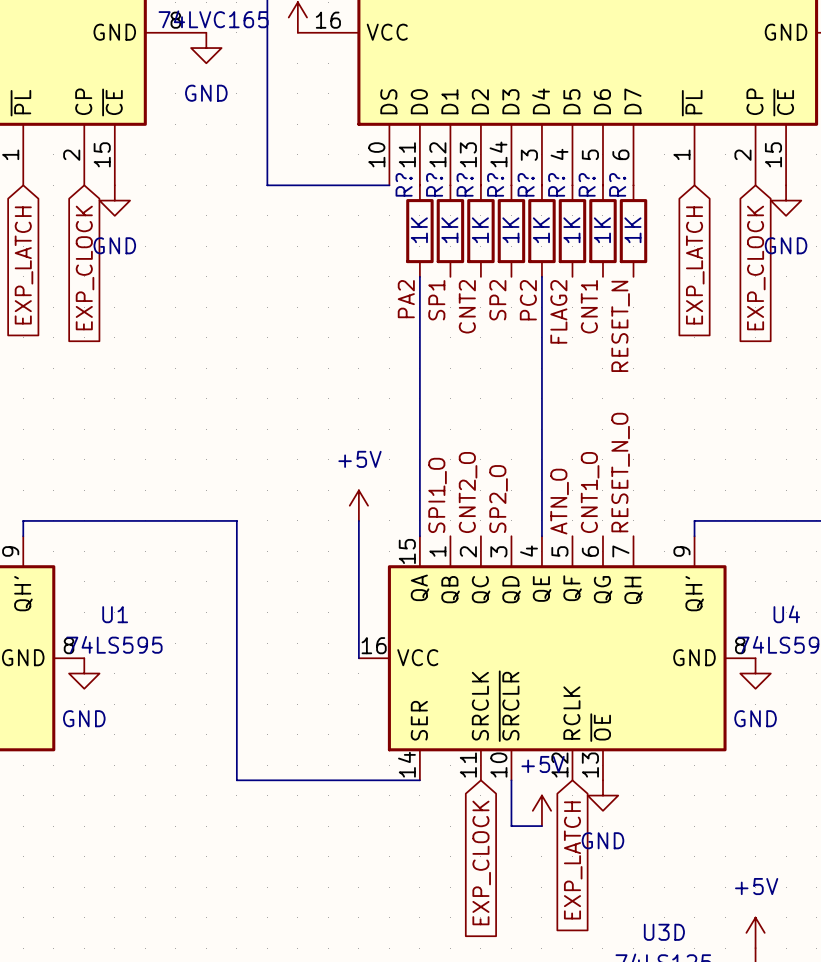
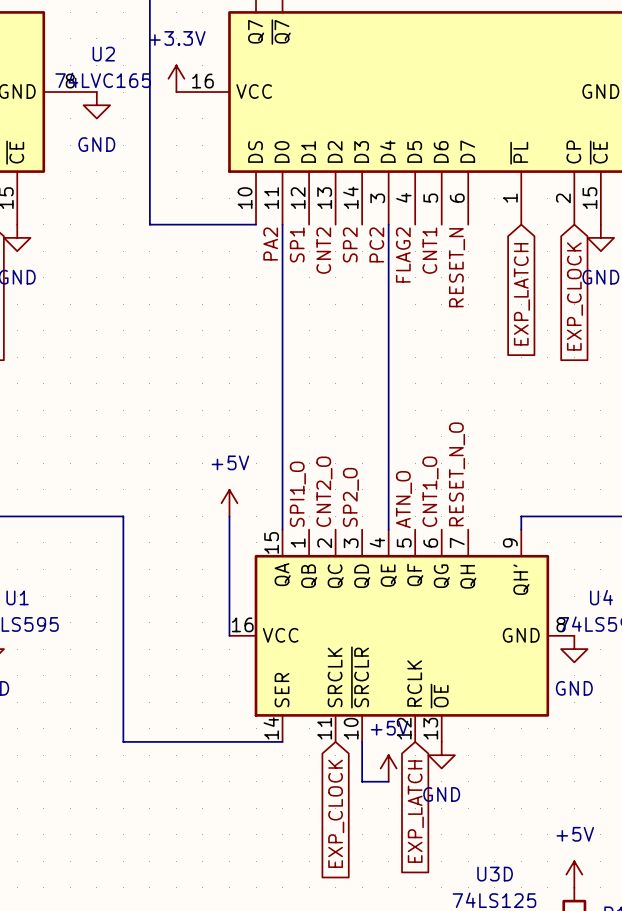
wire: none -> (282, 224) (282, 304)
wire: none -> (388, 224) (388, 304)
R?: 1K (419, 231) -> none
R?: 1K (450, 231) -> none
R?: 1K (480, 231) -> none
R?: 1K (511, 231) -> none
R?: 1K (541, 231) -> none
R?: 1K (572, 231) -> none
R?: 1K (602, 231) -> none
R?: 1K (633, 231) -> none
label position: PA2 (406, 299) -> PA2 (270, 244)
label position: SP1 (436, 300) -> SP1 (297, 244)
label position: SP2 (497, 300) -> SP2 (350, 244)
label position: PC2 (528, 300) -> PC2 (376, 244)
label position: CNT2 (467, 306) -> CNT2 (323, 250)
label position: CNT1 (589, 306) -> CNT1 (429, 250)
label position: FLAG2 (558, 311) -> FLAG2 (403, 255)
label position: RESET_N (620, 326) -> RESET_N (457, 267)

